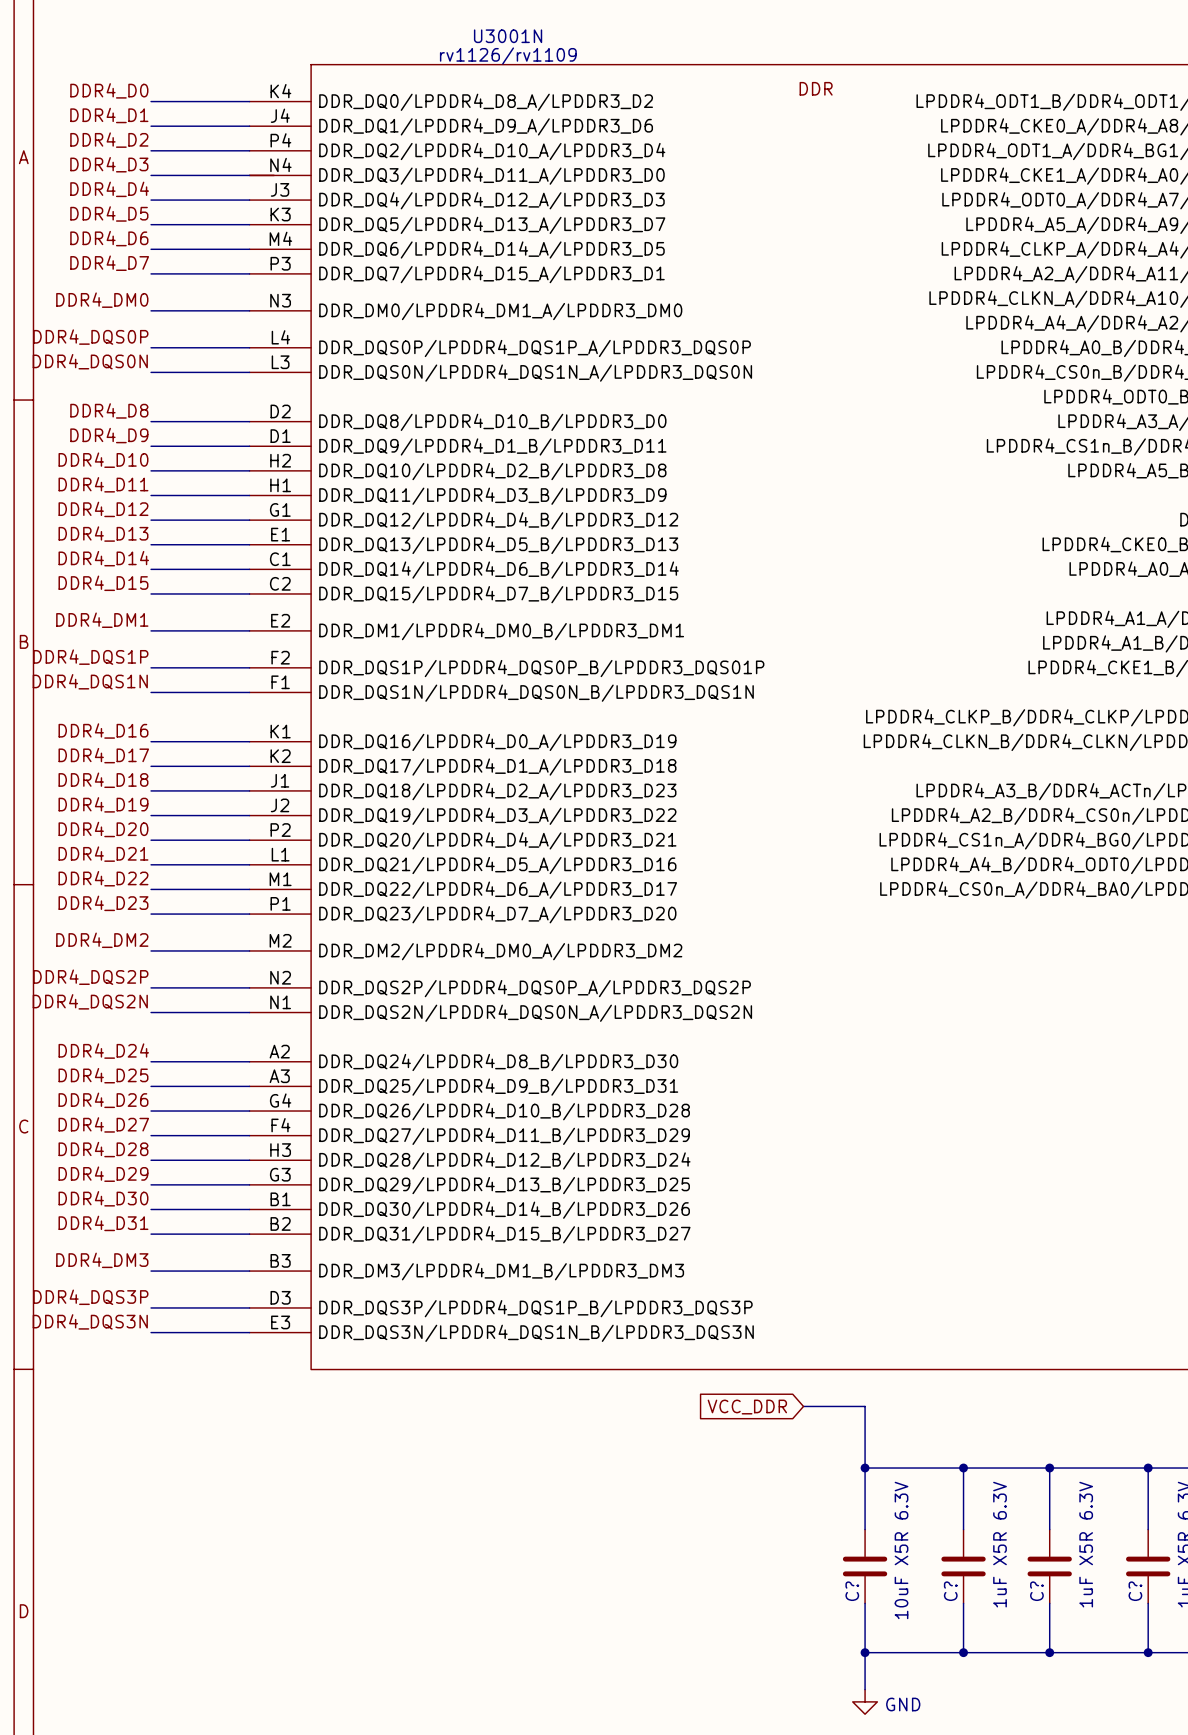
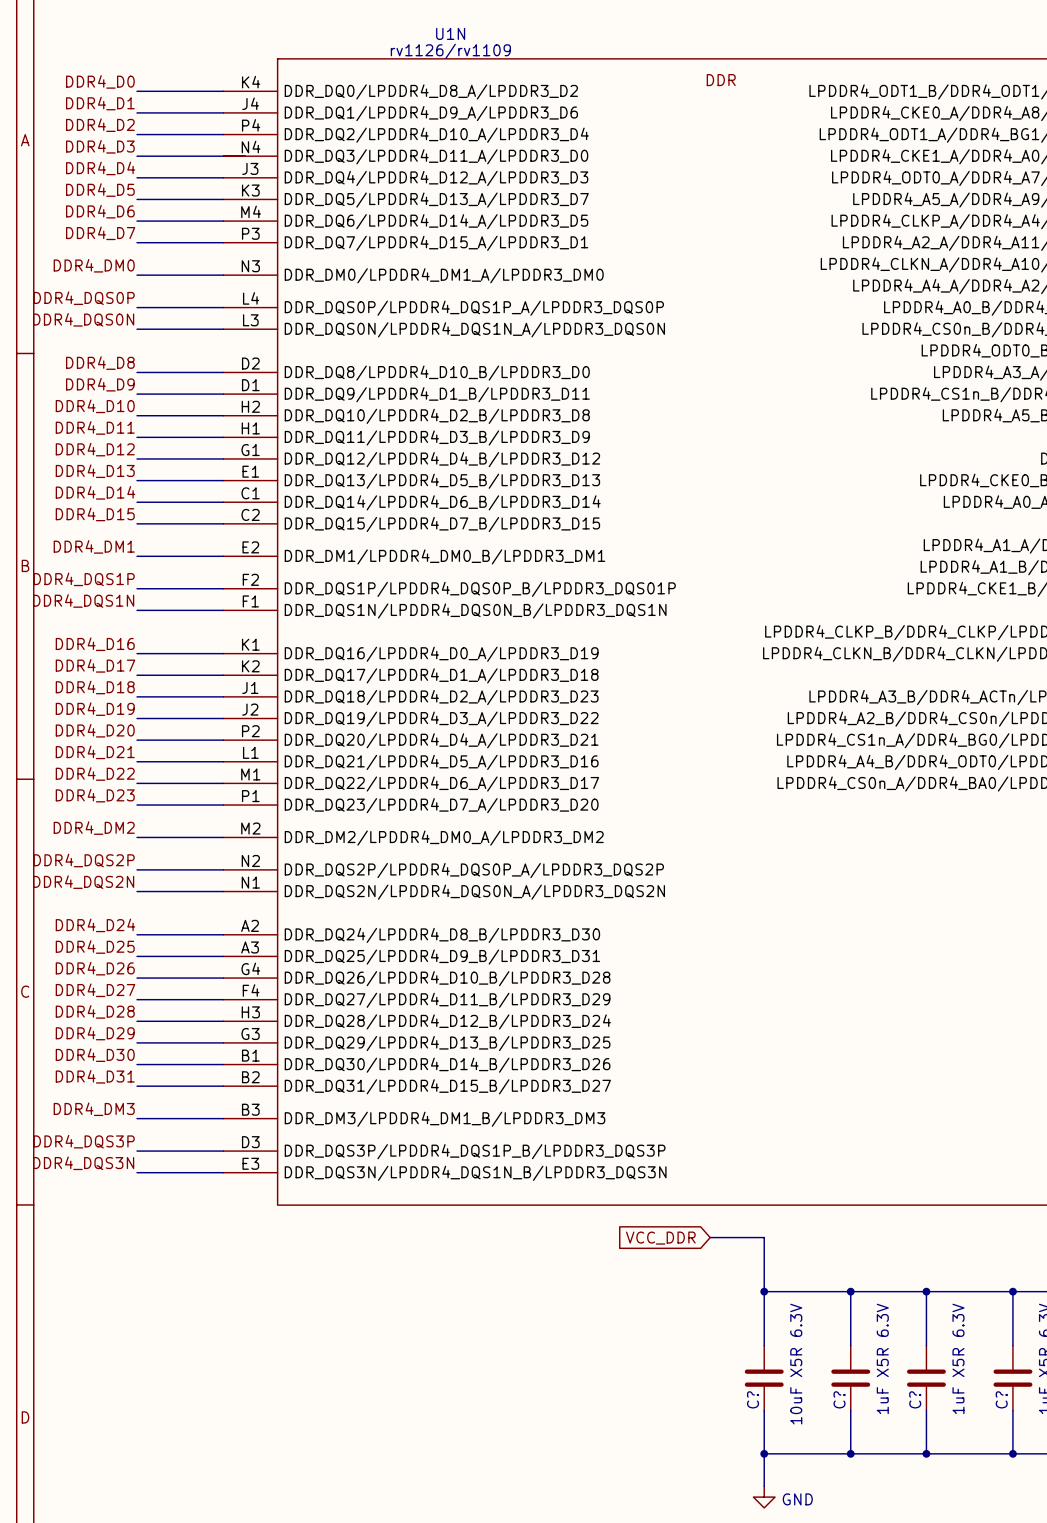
U3001N name: U3001N (508, 36) -> U1N (450, 33)

